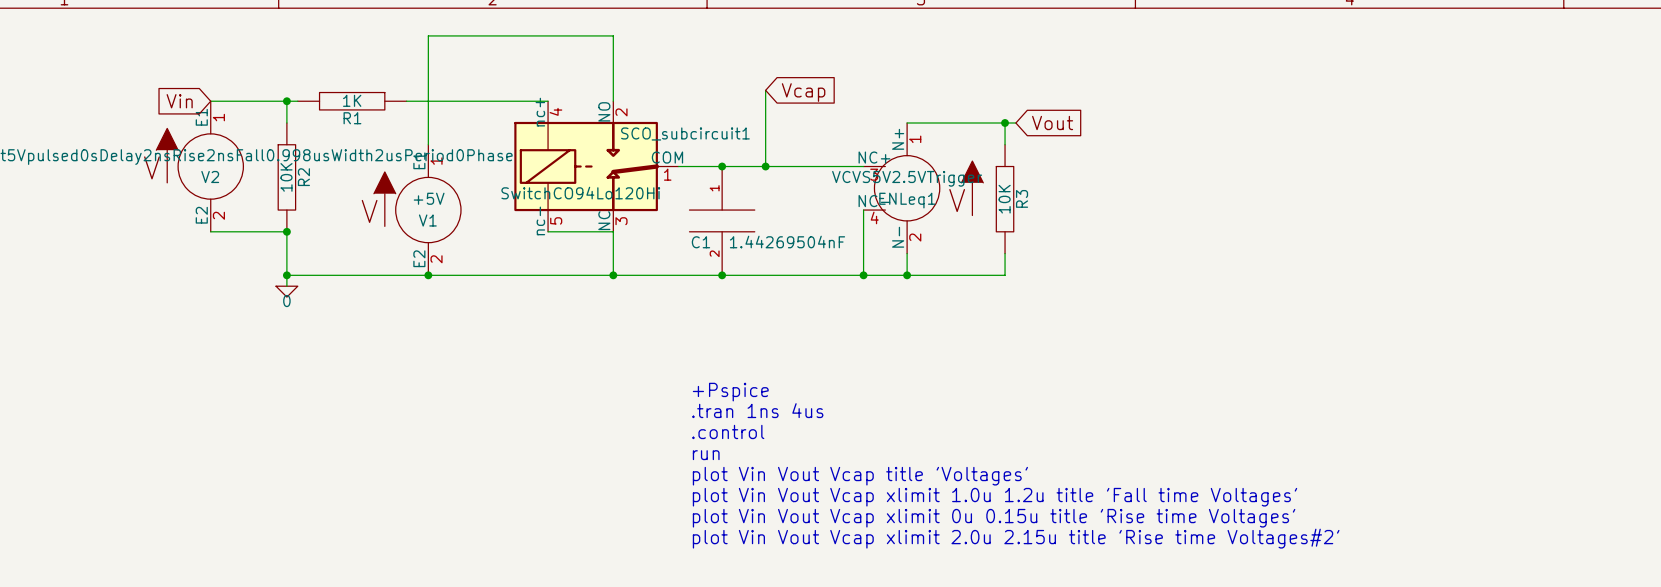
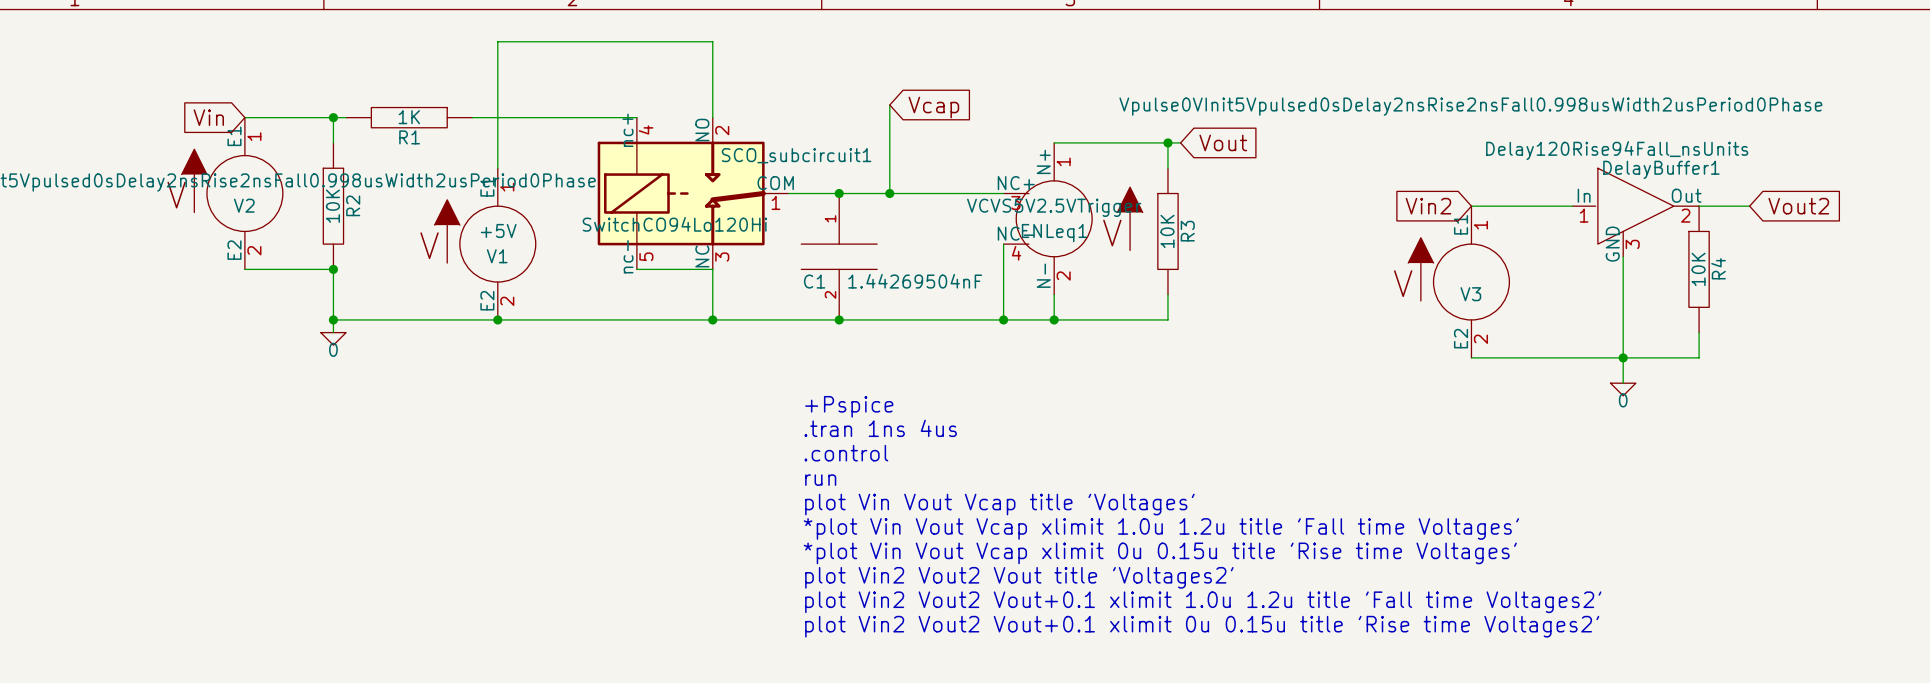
global label: none -> Vin2 (1428, 206)
wire: none -> (1471, 206) (1572, 206)
wire: none -> (1699, 206) (1749, 206)
global label: none -> Vout2 (1798, 206)
DelayBuffer1: none -> Delay120Rise94Fall_nsUnits (1635, 212)
wire: none -> (1623, 256) (1623, 383)
R4: none -> 10K (1699, 269)
V3: none -> Vpulse0VInit5Vpulsed0sDelay2nsRise2nsFall0.998usWidth2usPeriod0Phase (1458, 282)
wire: none -> (1699, 332) (1699, 357) (1471, 357)
junction: none -> (1623, 357)
power symbol: none -> 0 (1623, 389)
text: none -> +Pspice (849, 406)
text: none -> .tran 1ns 4us (880, 428)
text: +Pspice (730, 392) -> .control (846, 453)
text: .tran 1ns 4us (757, 410) -> run (820, 480)
text: .control (728, 431) -> plot Vin Vout Vcap title 'Voltages' (999, 504)
text: run (706, 455) -> *plot Vin Vout Vcap xlimit 1.0u 1.2u title 'Fall time Voltages' (1161, 528)
text: plot Vin Vout Vcap title 'Voltages' (860, 476) -> *plot Vin Vout Vcap xlimit 0u 0.15u title 'Rise time Voltages' (1160, 553)
text: plot Vin Vout Vcap xlimit 1.0u 1.2u title 'Fall time Voltages' (995, 497) -> plot Vin2 Vout2 Vout title 'Voltages2' (1019, 577)
text: plot Vin Vout Vcap xlimit 0u 0.15u title 'Rise time Voltages' (994, 518) -> plot Vin2 Vout2 Vout+0.1 xlimit 1.0u 1.2u title 'Fall time Voltages2' (1203, 602)
text: plot Vin Vout Vcap xlimit 2.0u 2.15u title 'Rise time Voltages#2' (1016, 538) -> plot Vin2 Vout2 Vout+0.1 xlimit 0u 0.15u title 'Rise time Voltages2' (1202, 626)

